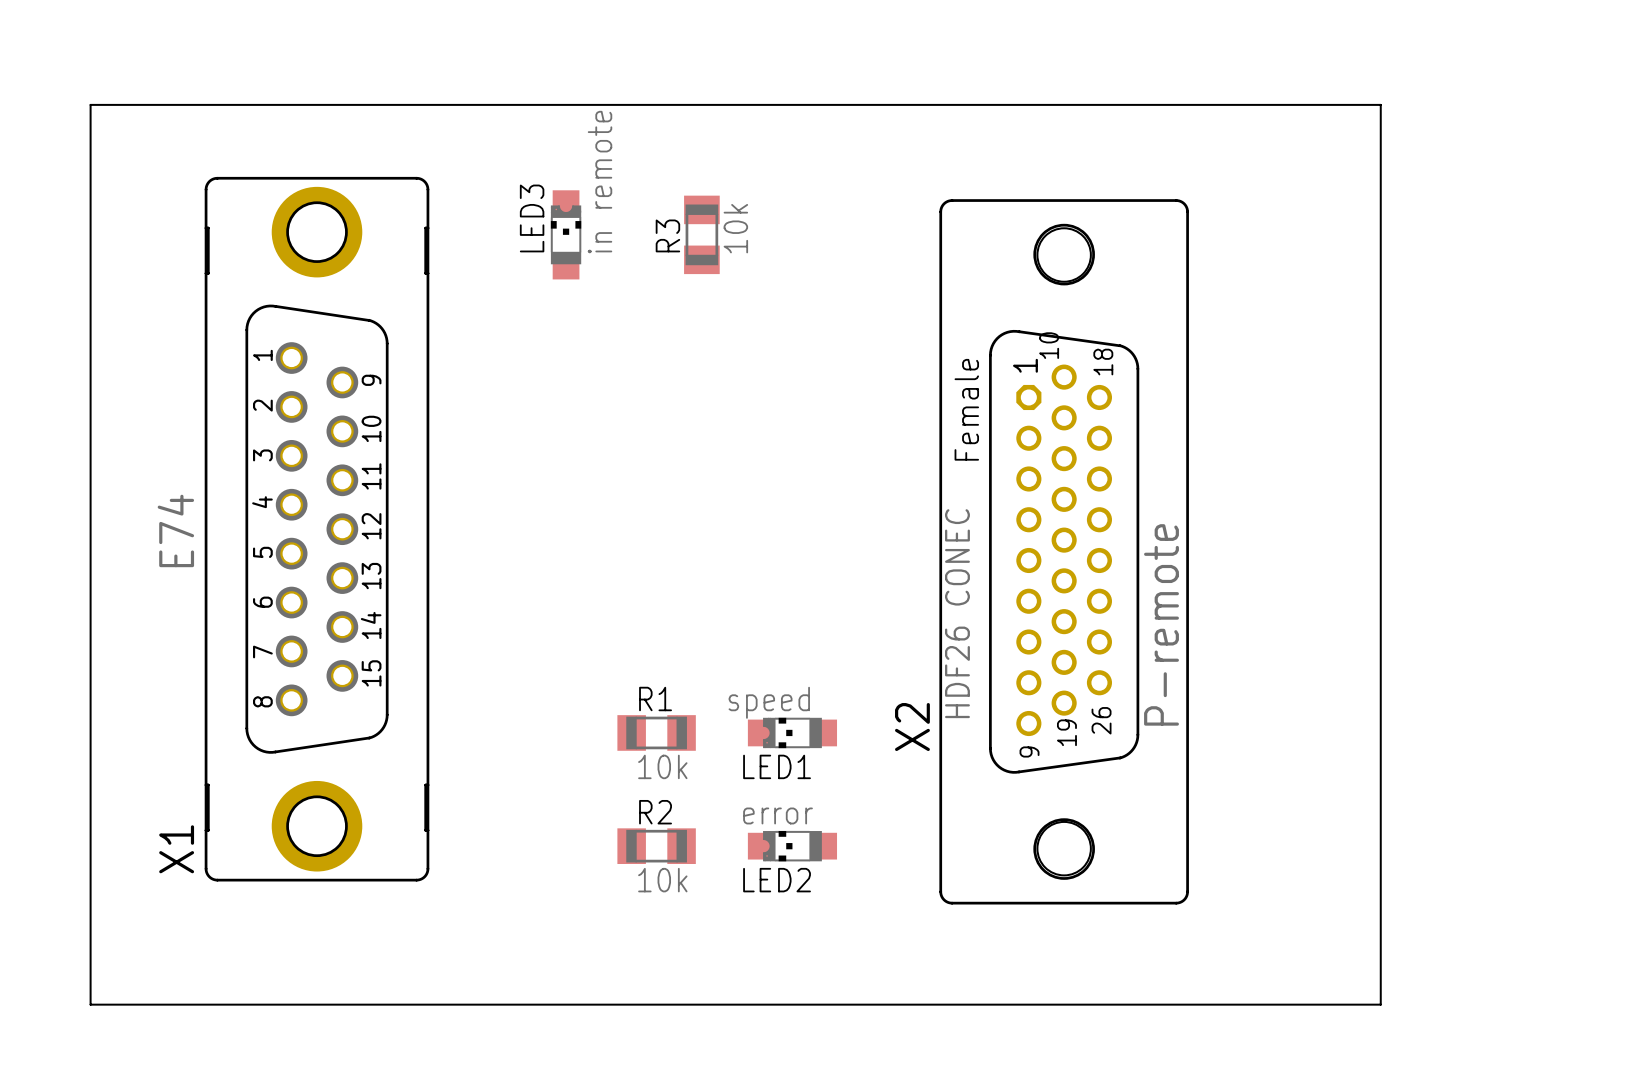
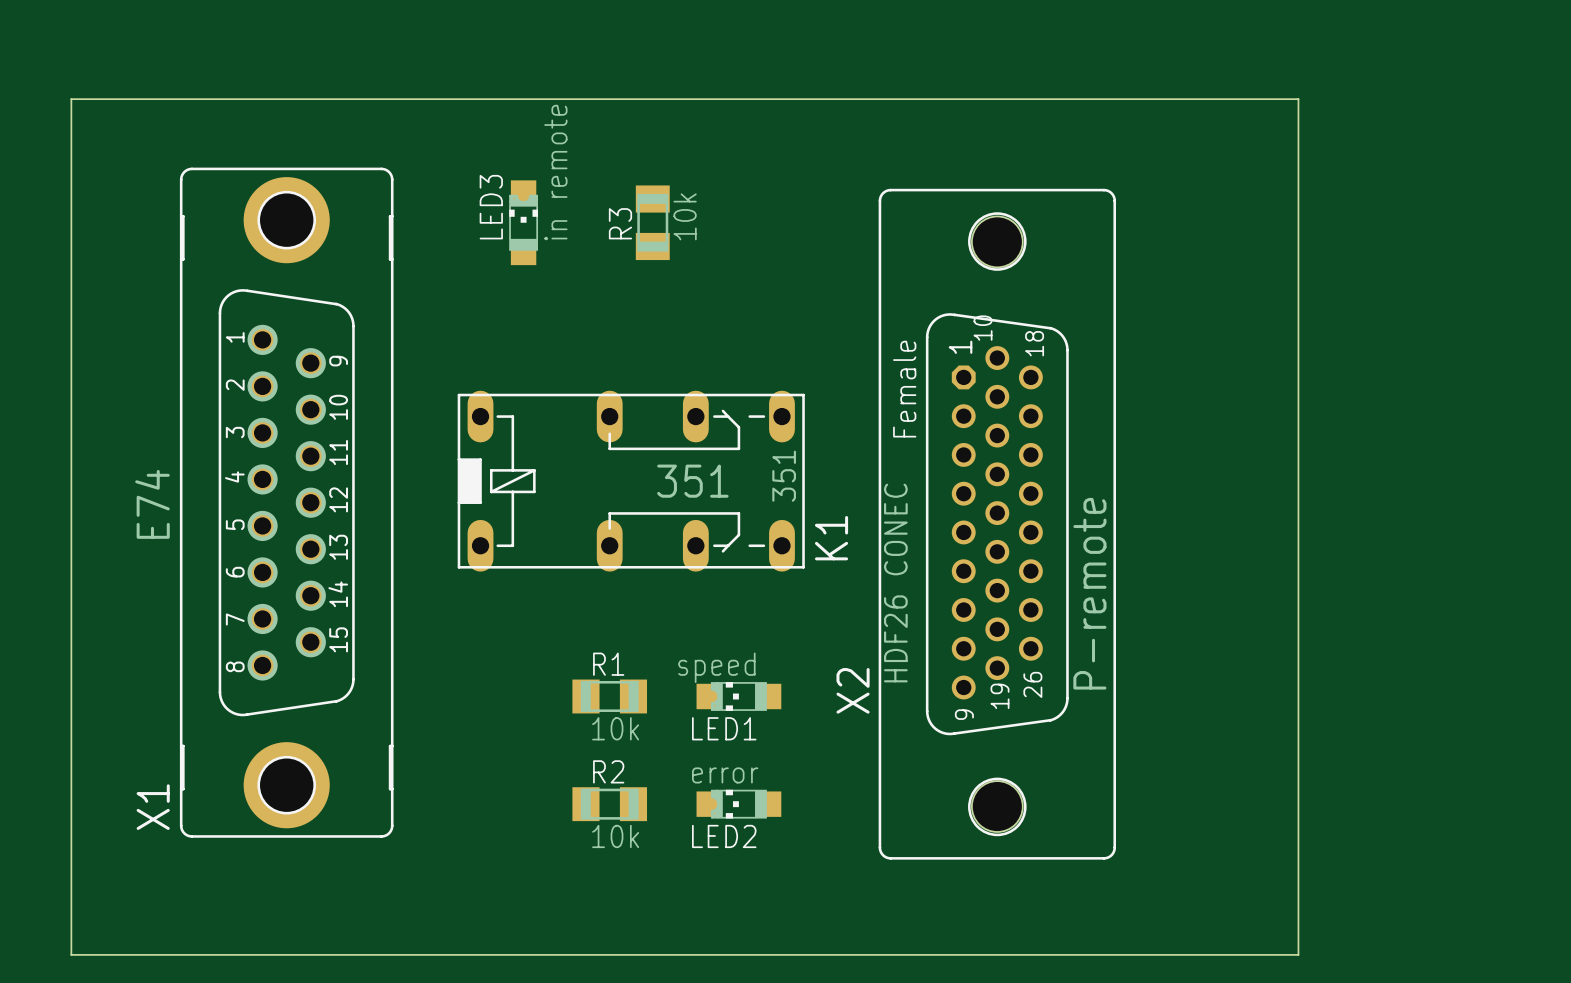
K1: none -> 351 (631, 481)

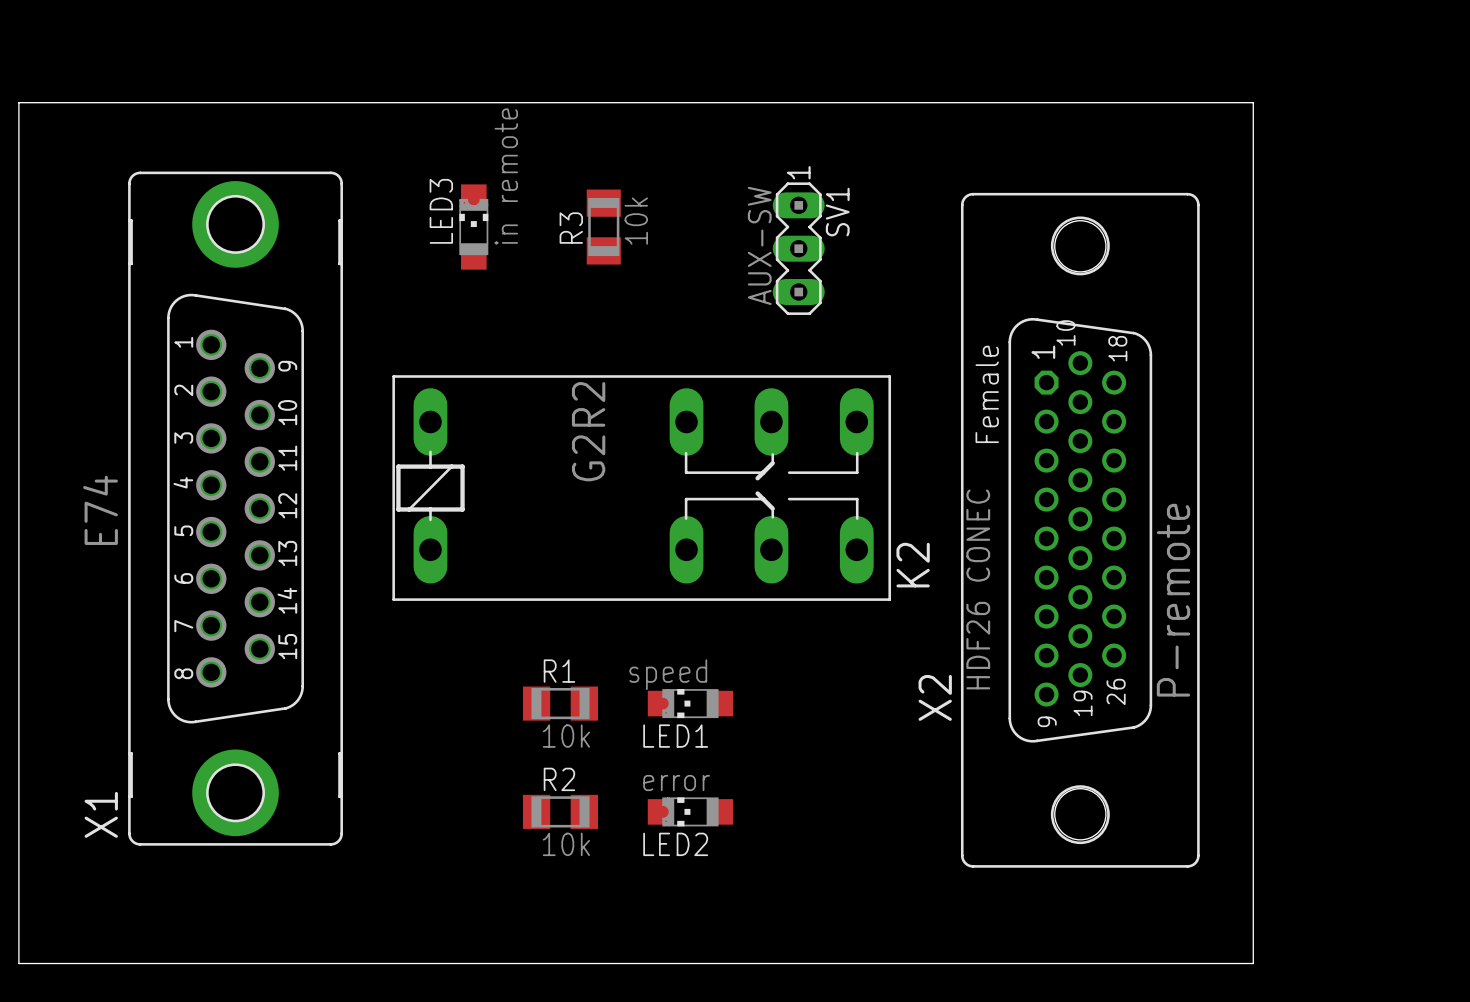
SV1: none -> AUX-SW (798, 248)
K1: 351 (631, 481) -> none
K2: none -> G2R2 (641, 488)
X2 position: (997, 524) -> (1080, 530)

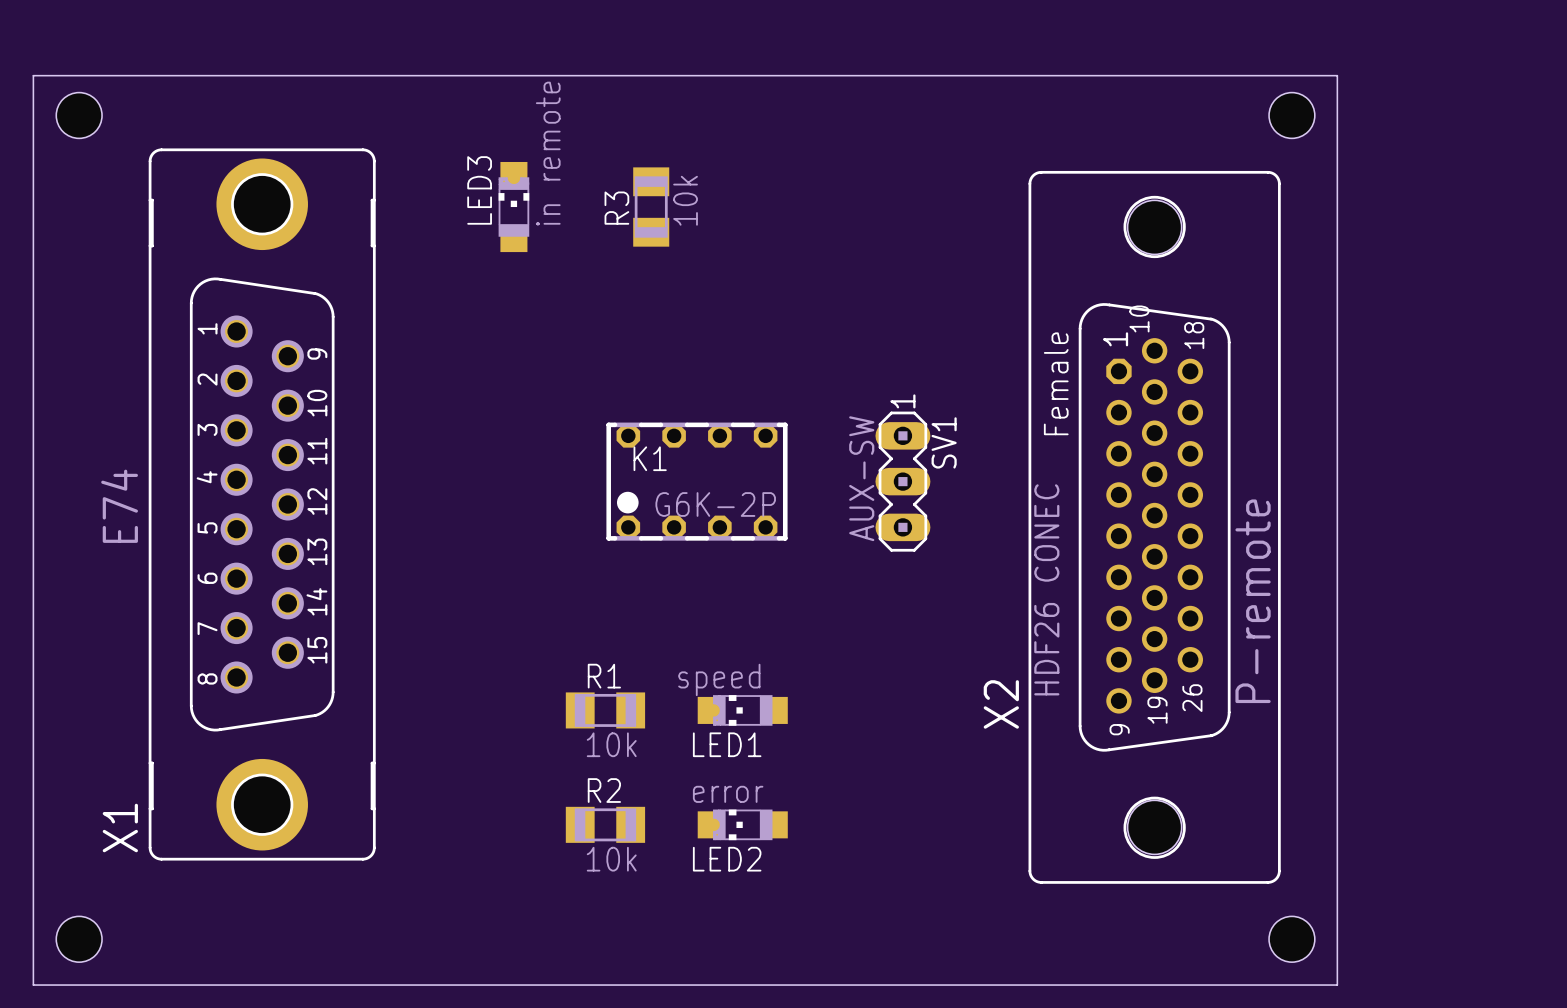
hole: none -> (79, 115)
hole: none -> (1291, 115)
SV1 position: (798, 248) -> (902, 481)
K1: none -> G6K-2P (696, 481)
K2: G2R2 (641, 488) -> none
hole: none -> (79, 939)
hole: none -> (1291, 939)

